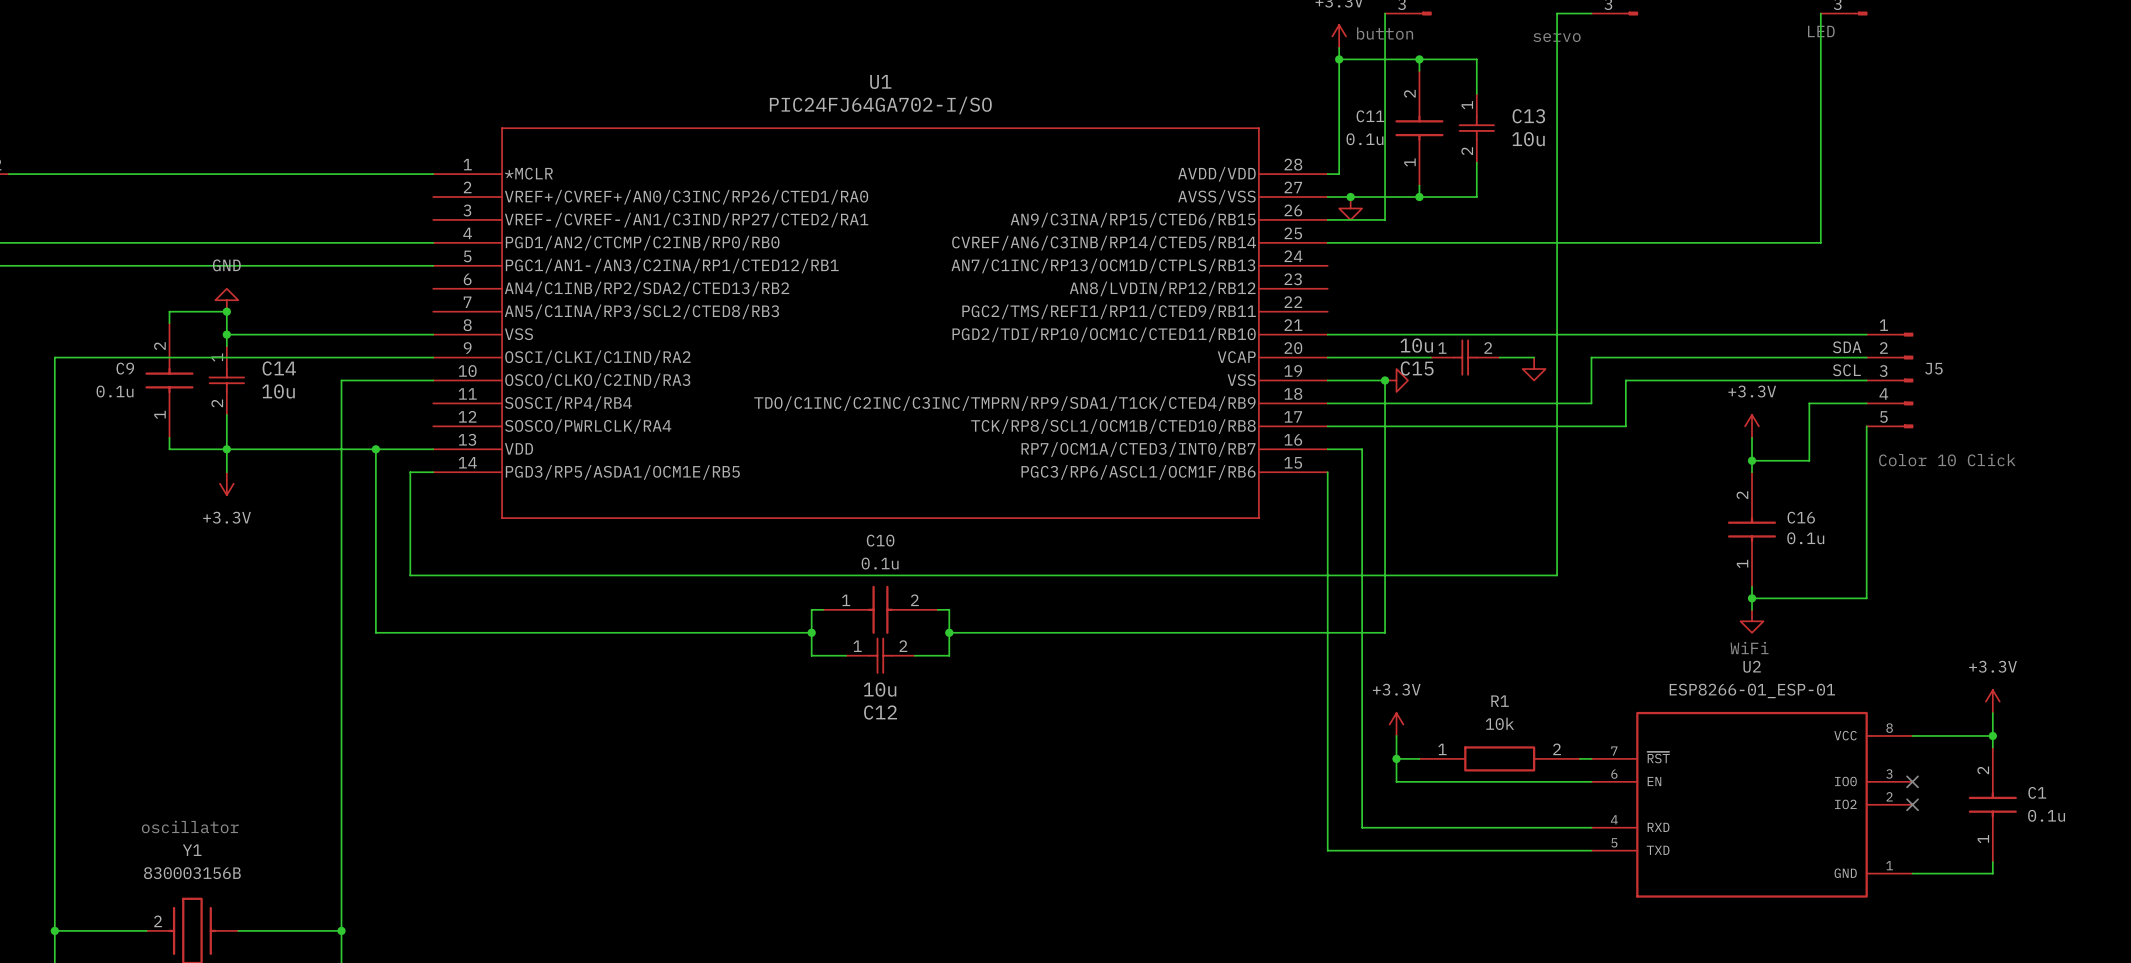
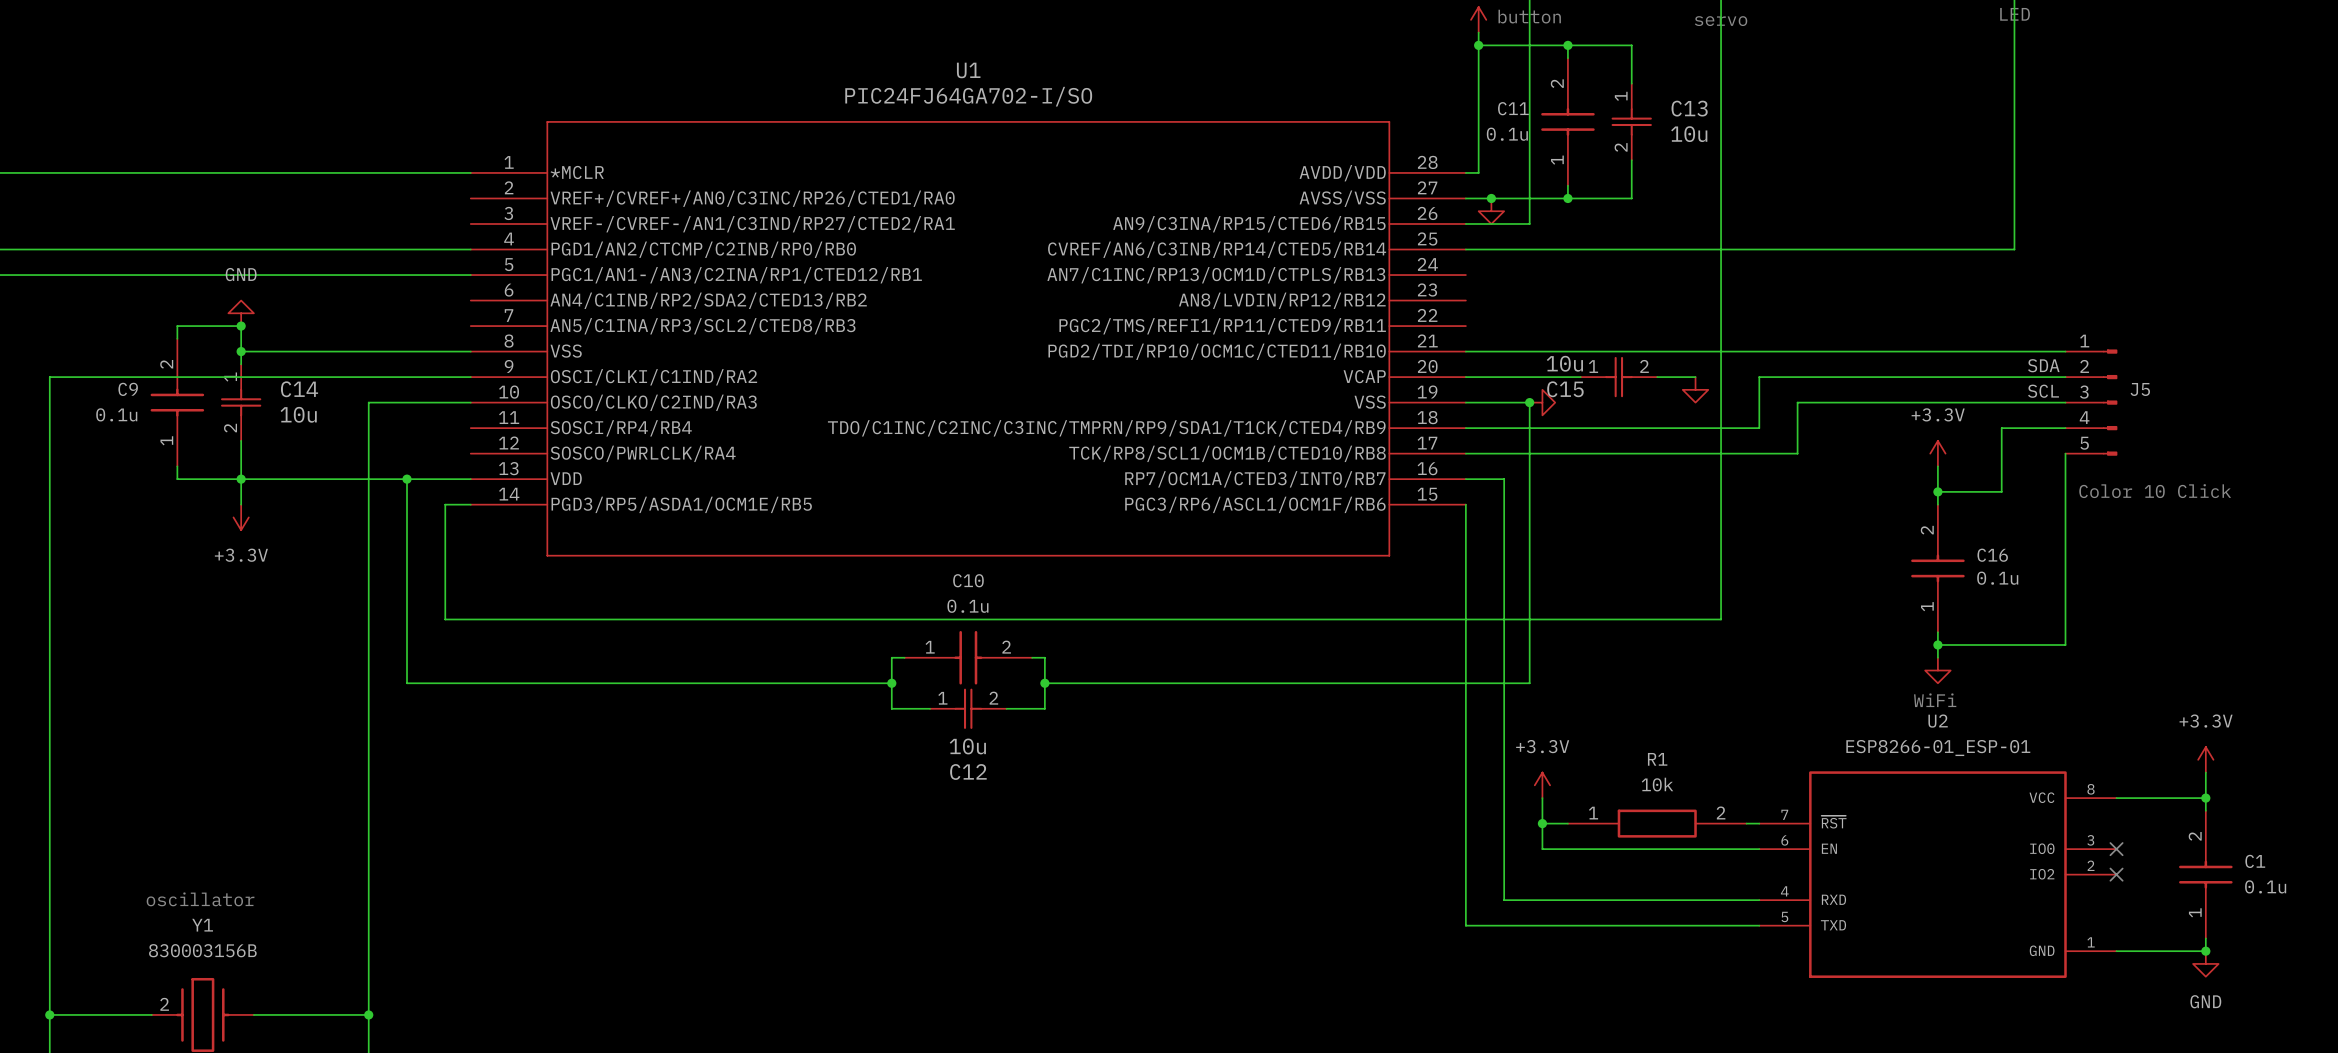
junction: none -> (2205, 951)
power symbol: none -> GND (2205, 963)

